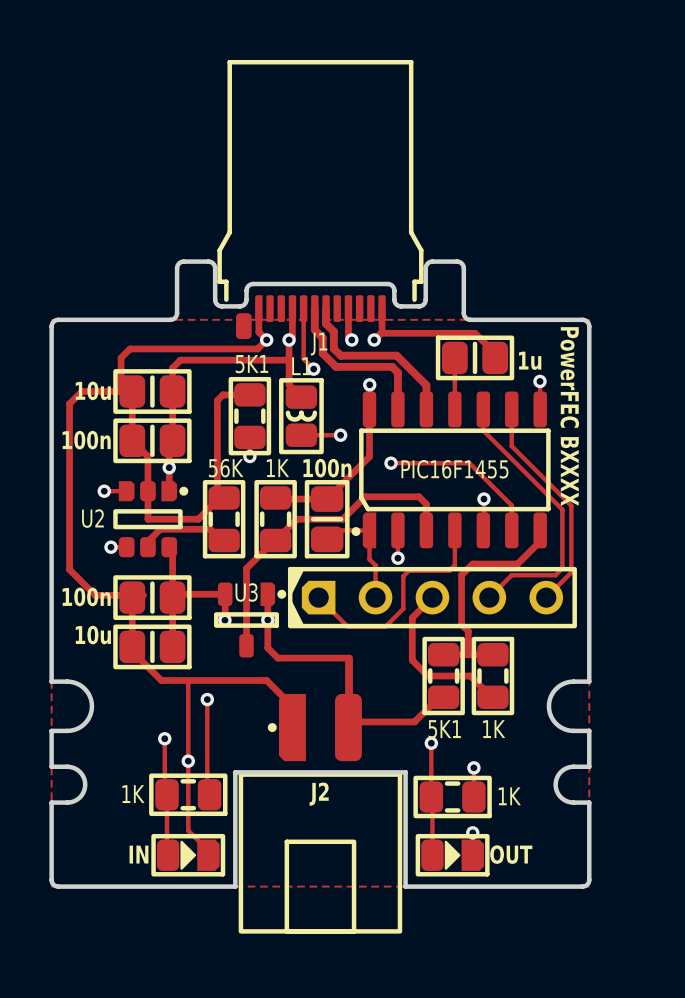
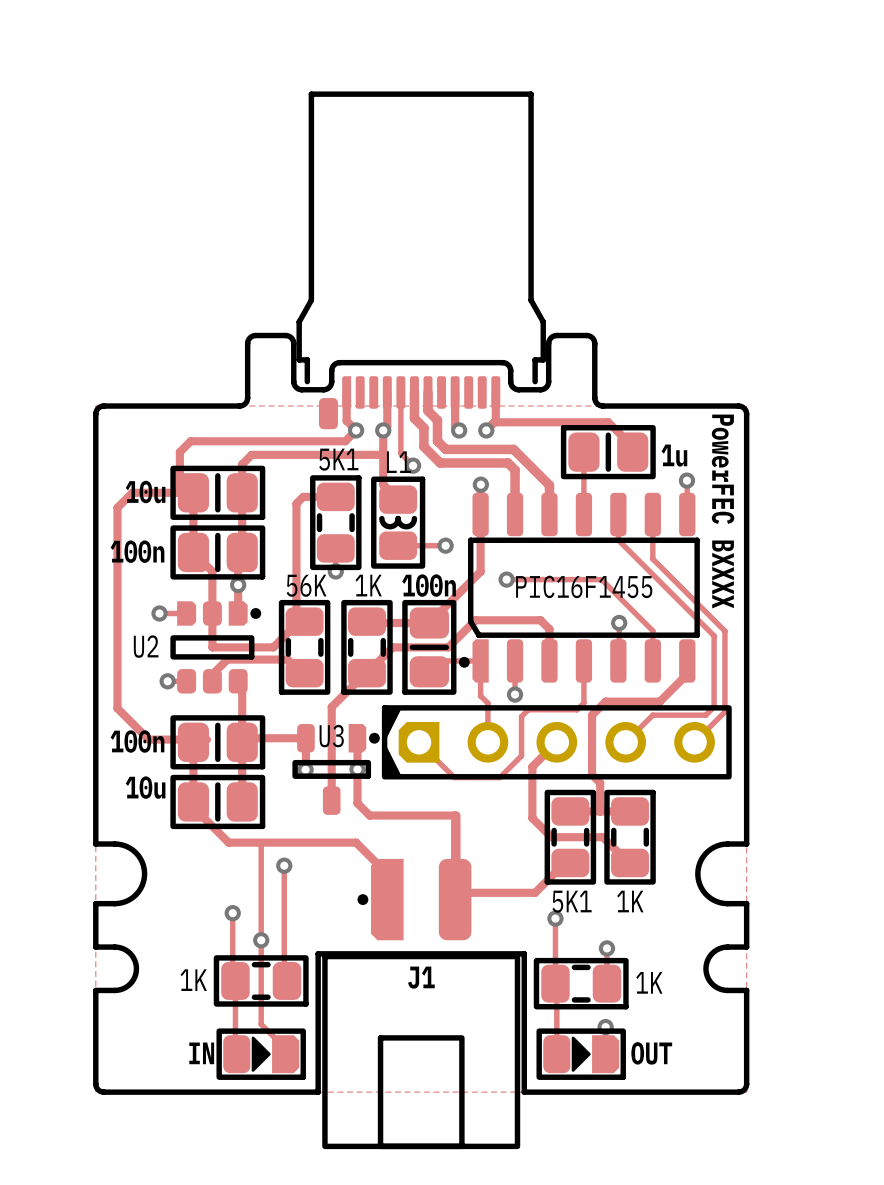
J1 name: J1 (319, 344) -> none
J2 name: J2 (319, 794) -> J1 (421, 977)

